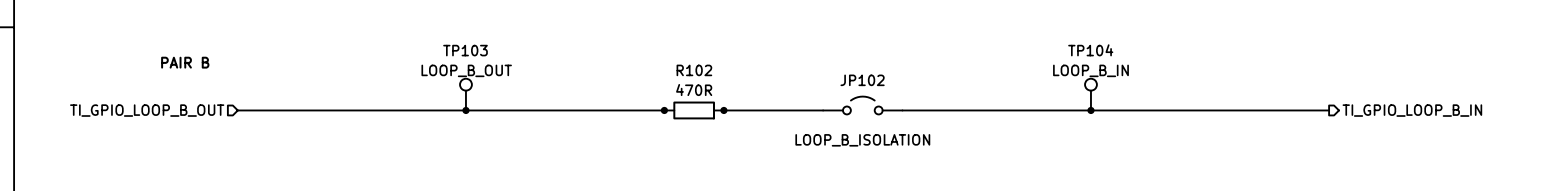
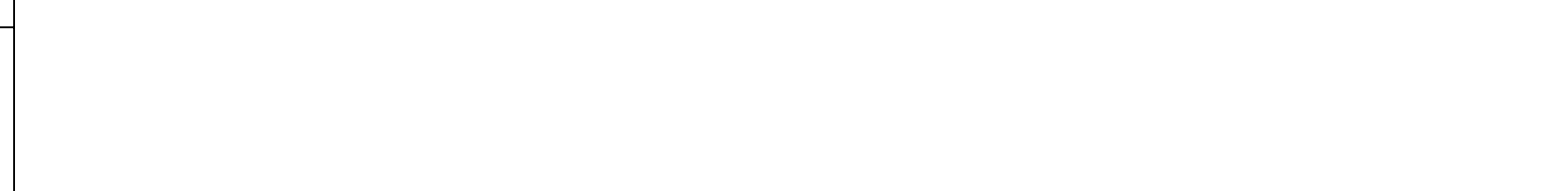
text: PAIR B (185, 62) -> none
TP103: LOOP_B_OUT (465, 94) -> none
TP104: LOOP_B_IN (1090, 94) -> none
JP102: LOOP_B_ISOLATION (862, 105) -> none
hierarchical label: TI_GPIO_LOOP_B_OUT (147, 110) -> none
wire: (237, 110) (664, 110) -> none
junction: (465, 110) -> none
junction: (664, 110) -> none
R102: 470R (694, 110) -> none
wire: (723, 110) (823, 110) -> none
junction: (723, 110) -> none
wire: (902, 110) (1329, 110) -> none
junction: (1090, 110) -> none
hierarchical label: TI_GPIO_LOOP_B_IN (1412, 110) -> none

